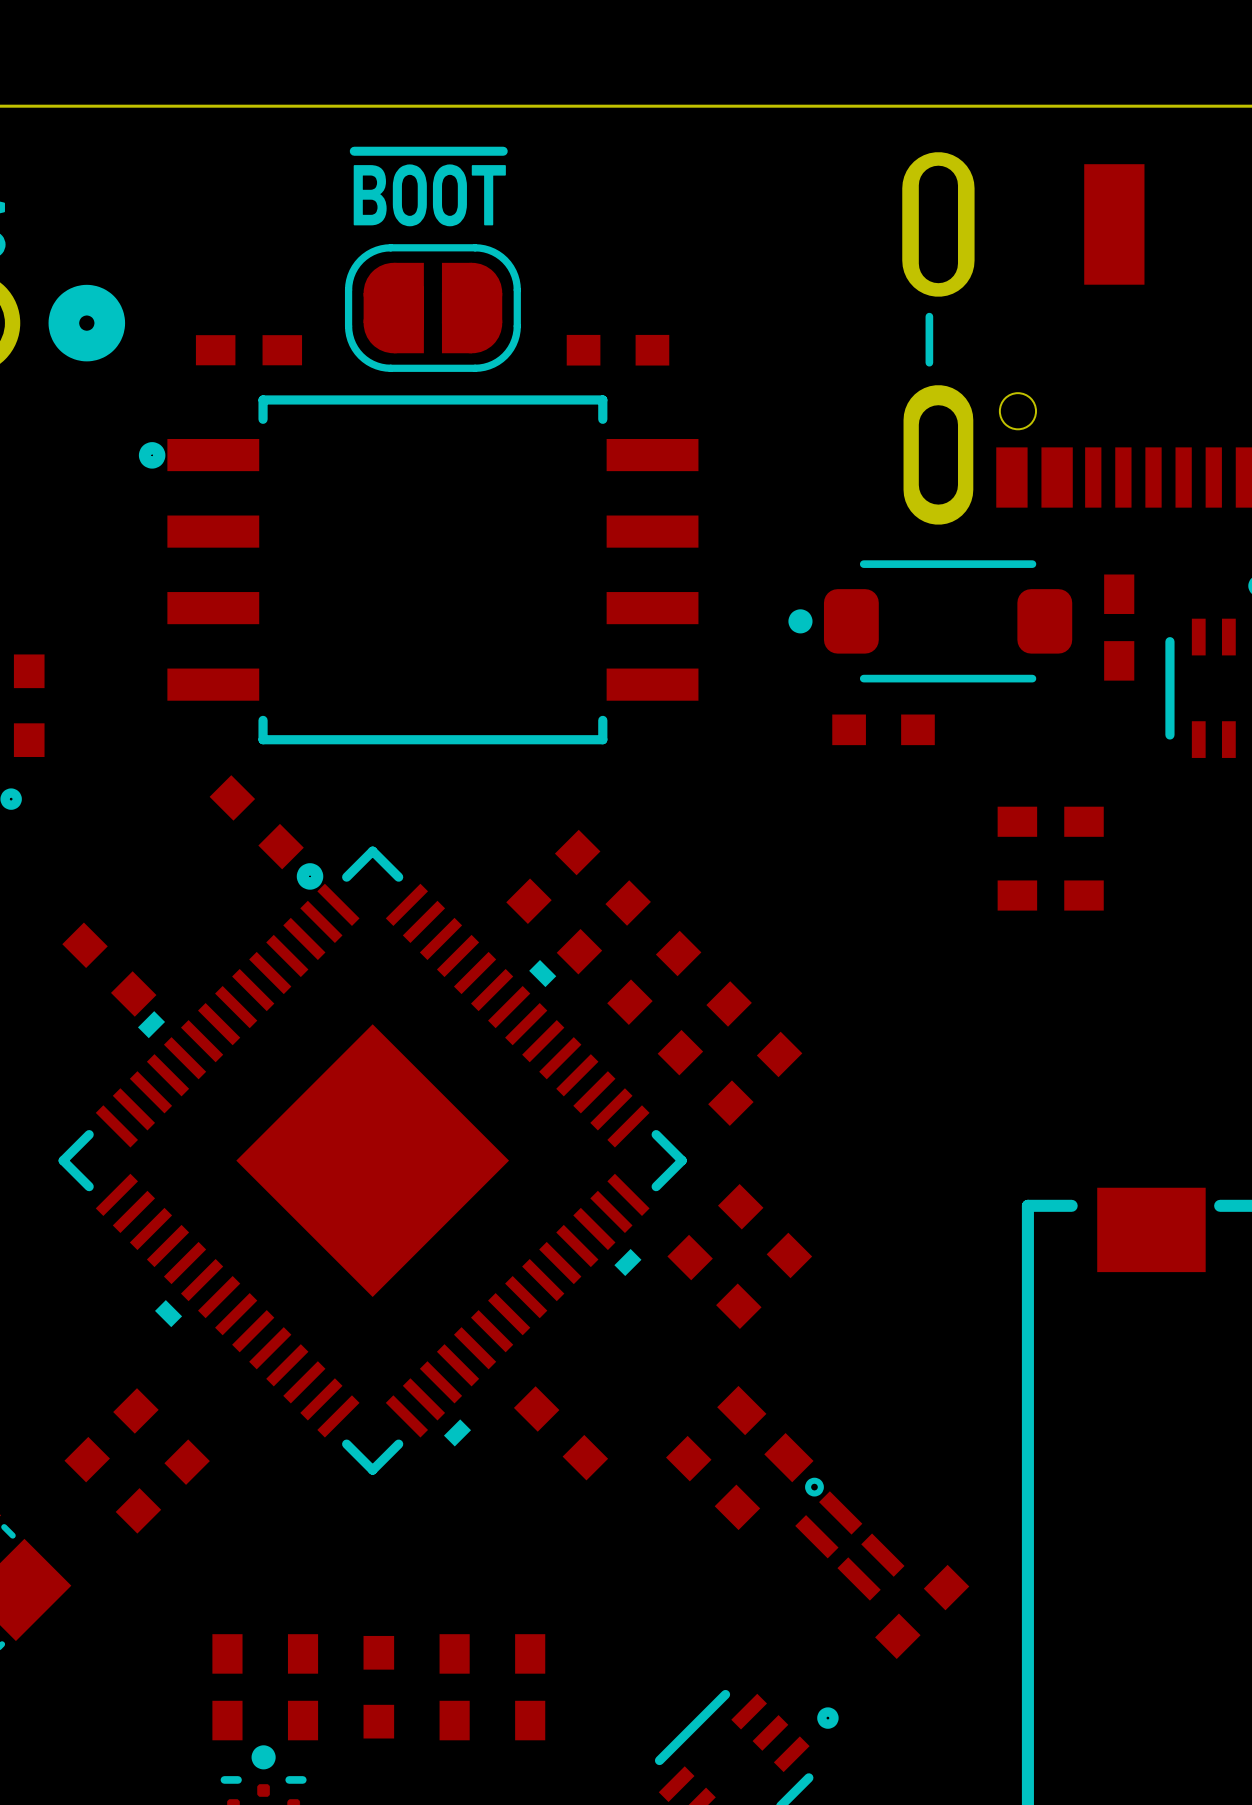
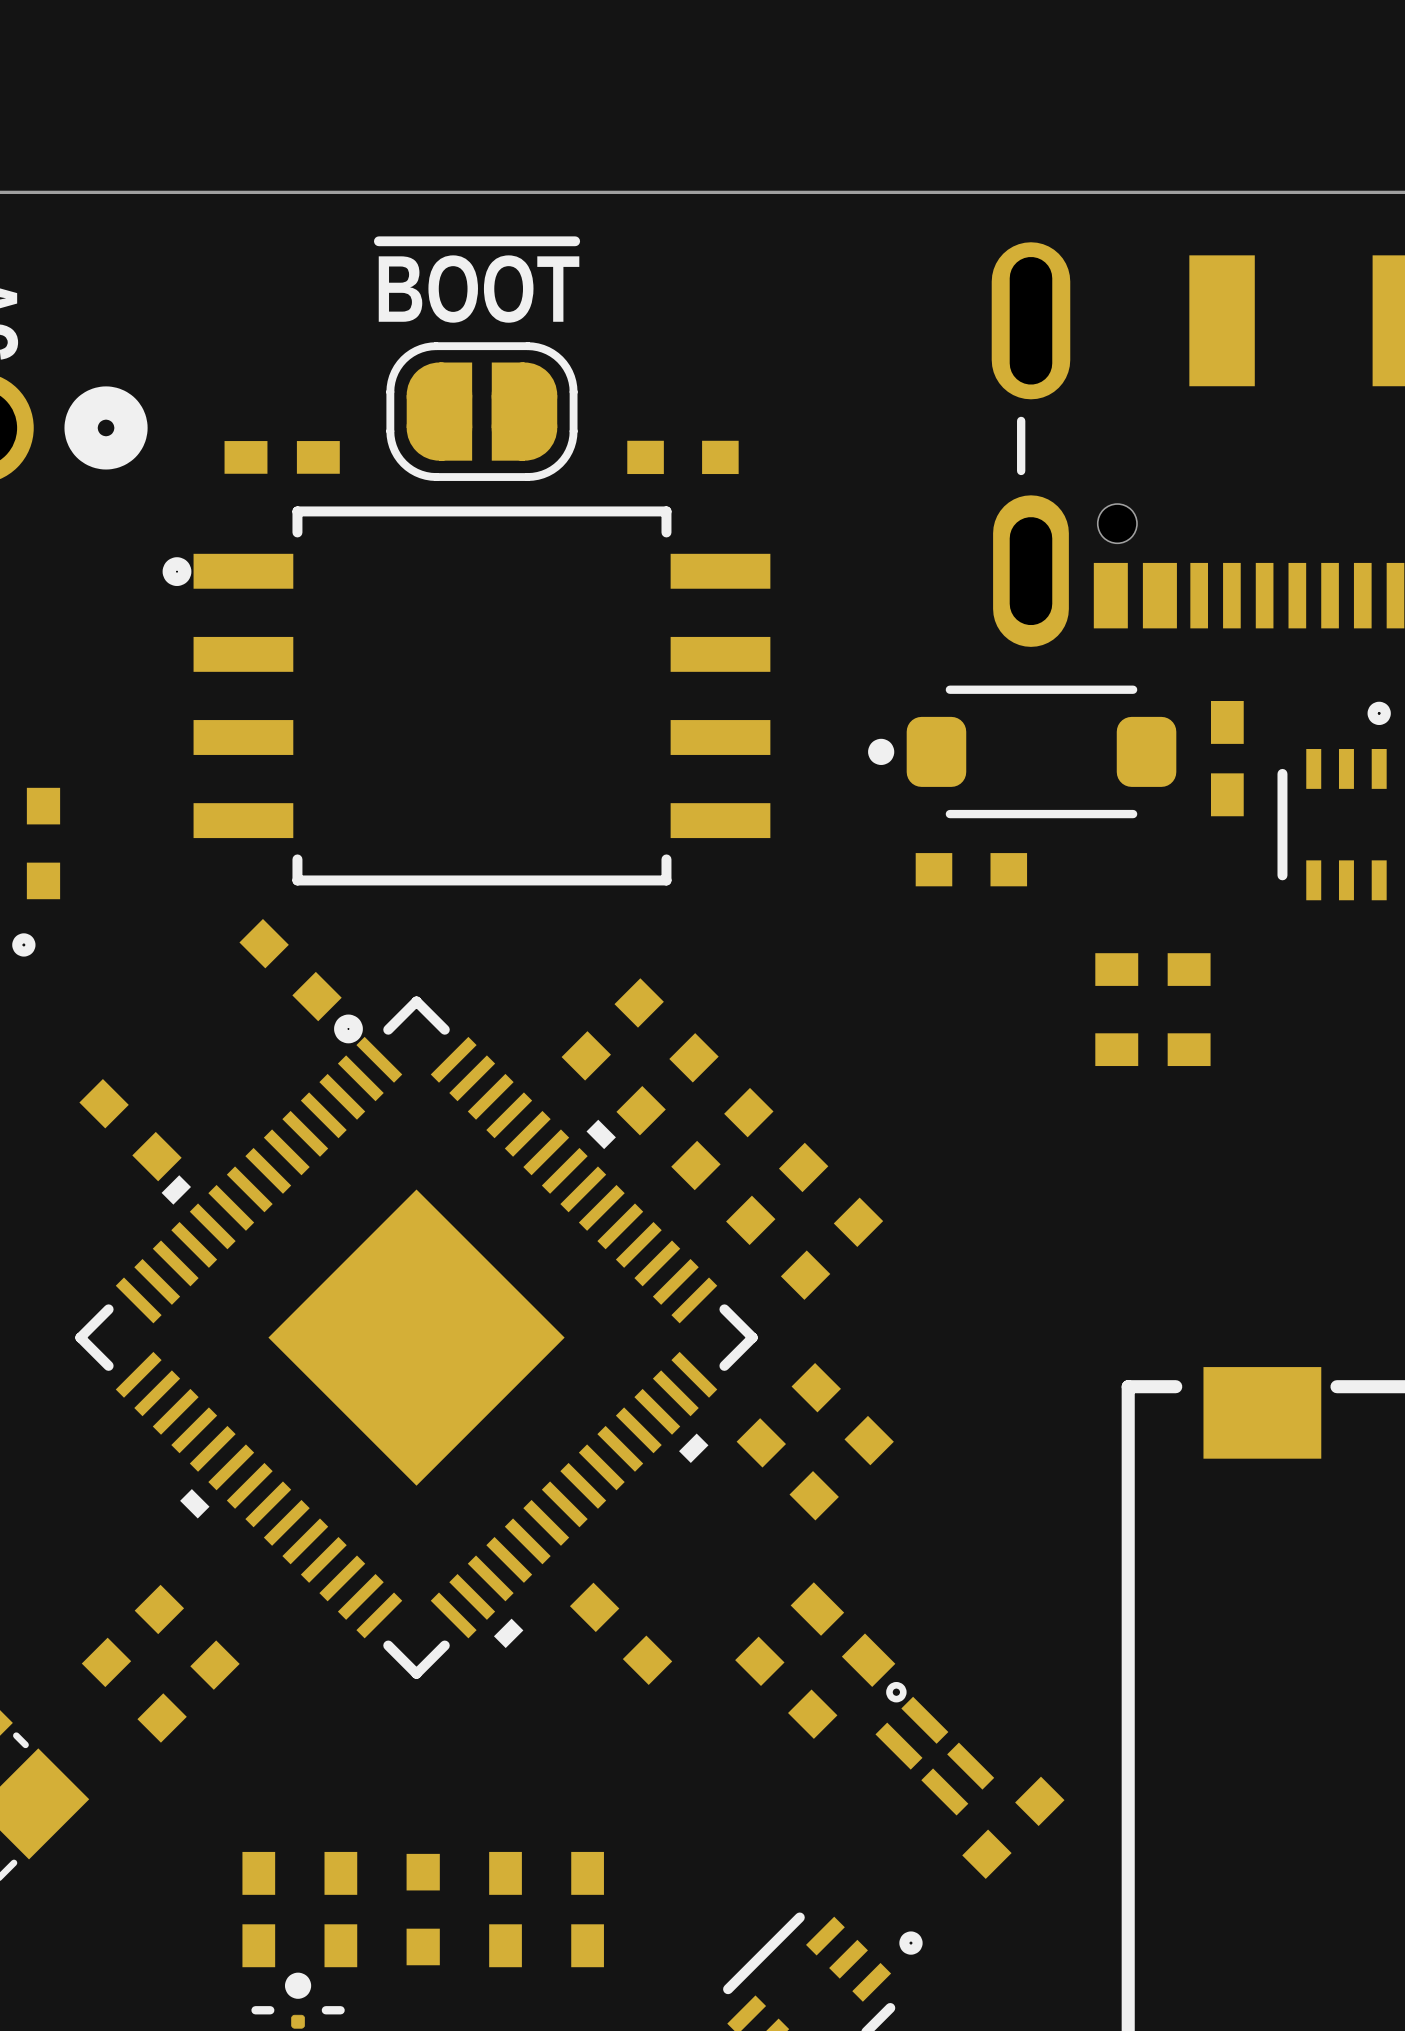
text position: ~{BOOT} (429, 188) -> ~{BOOT} (479, 282)

